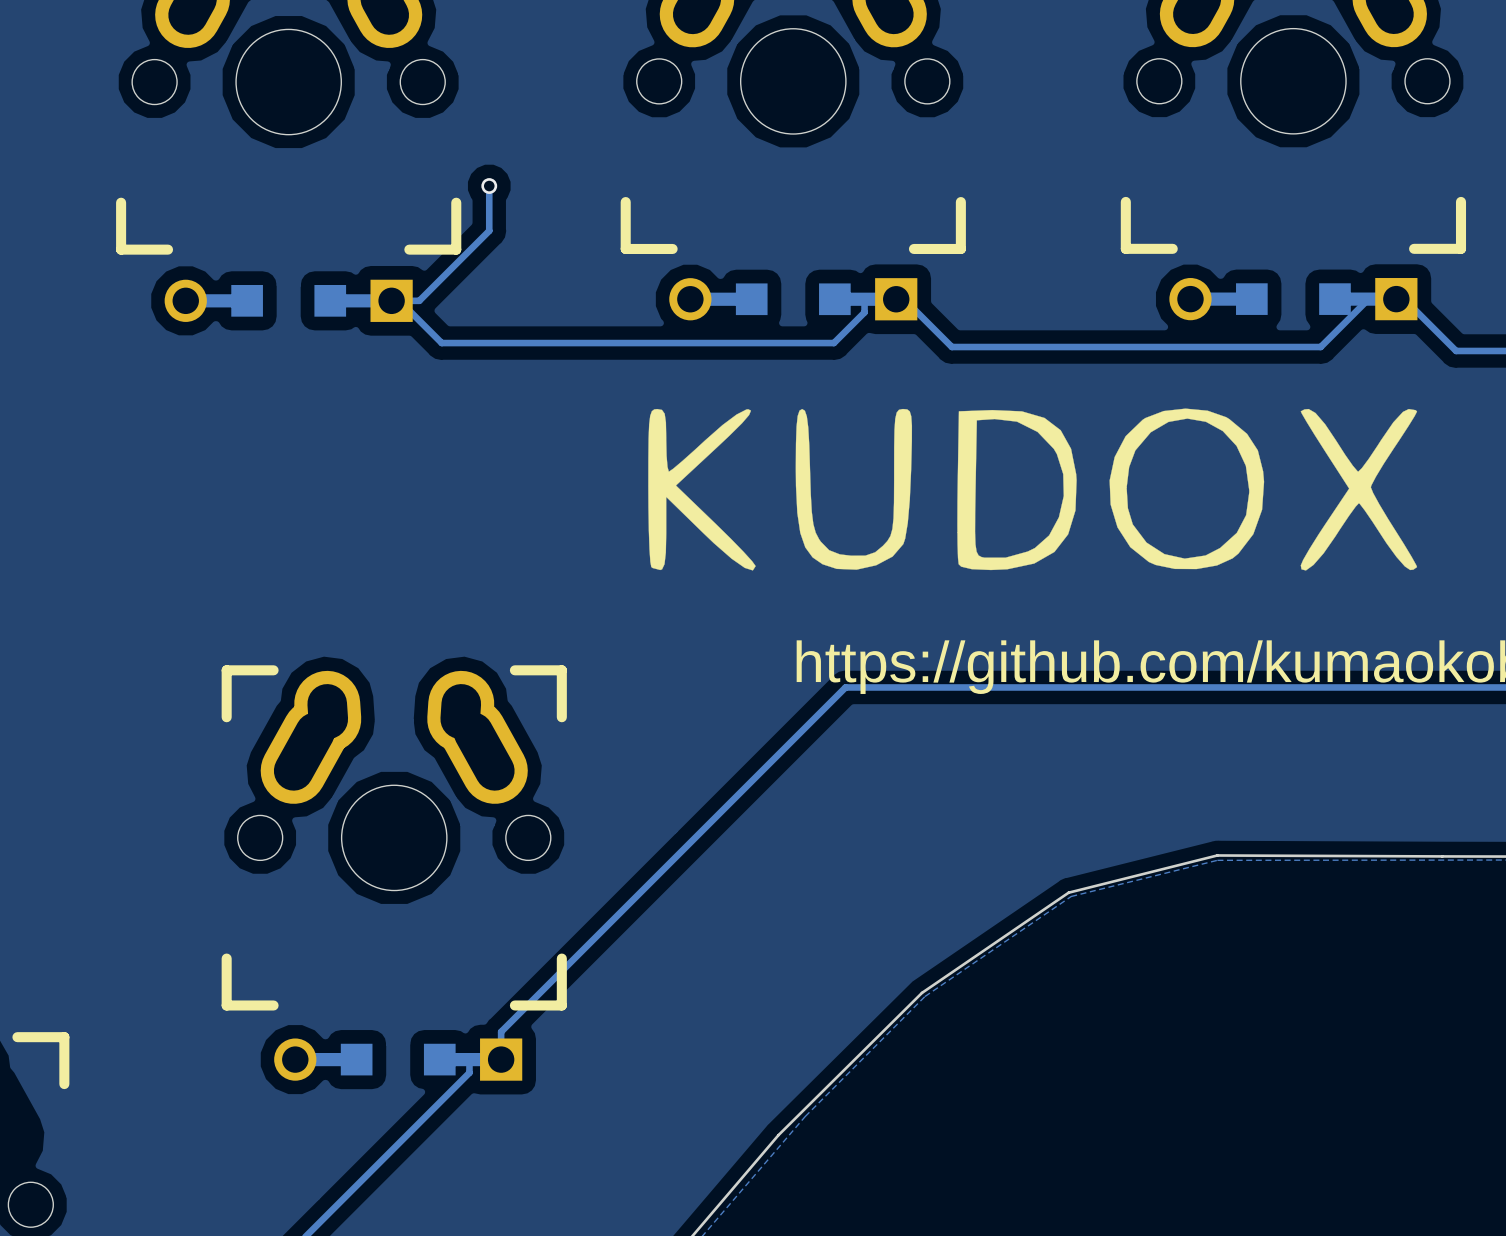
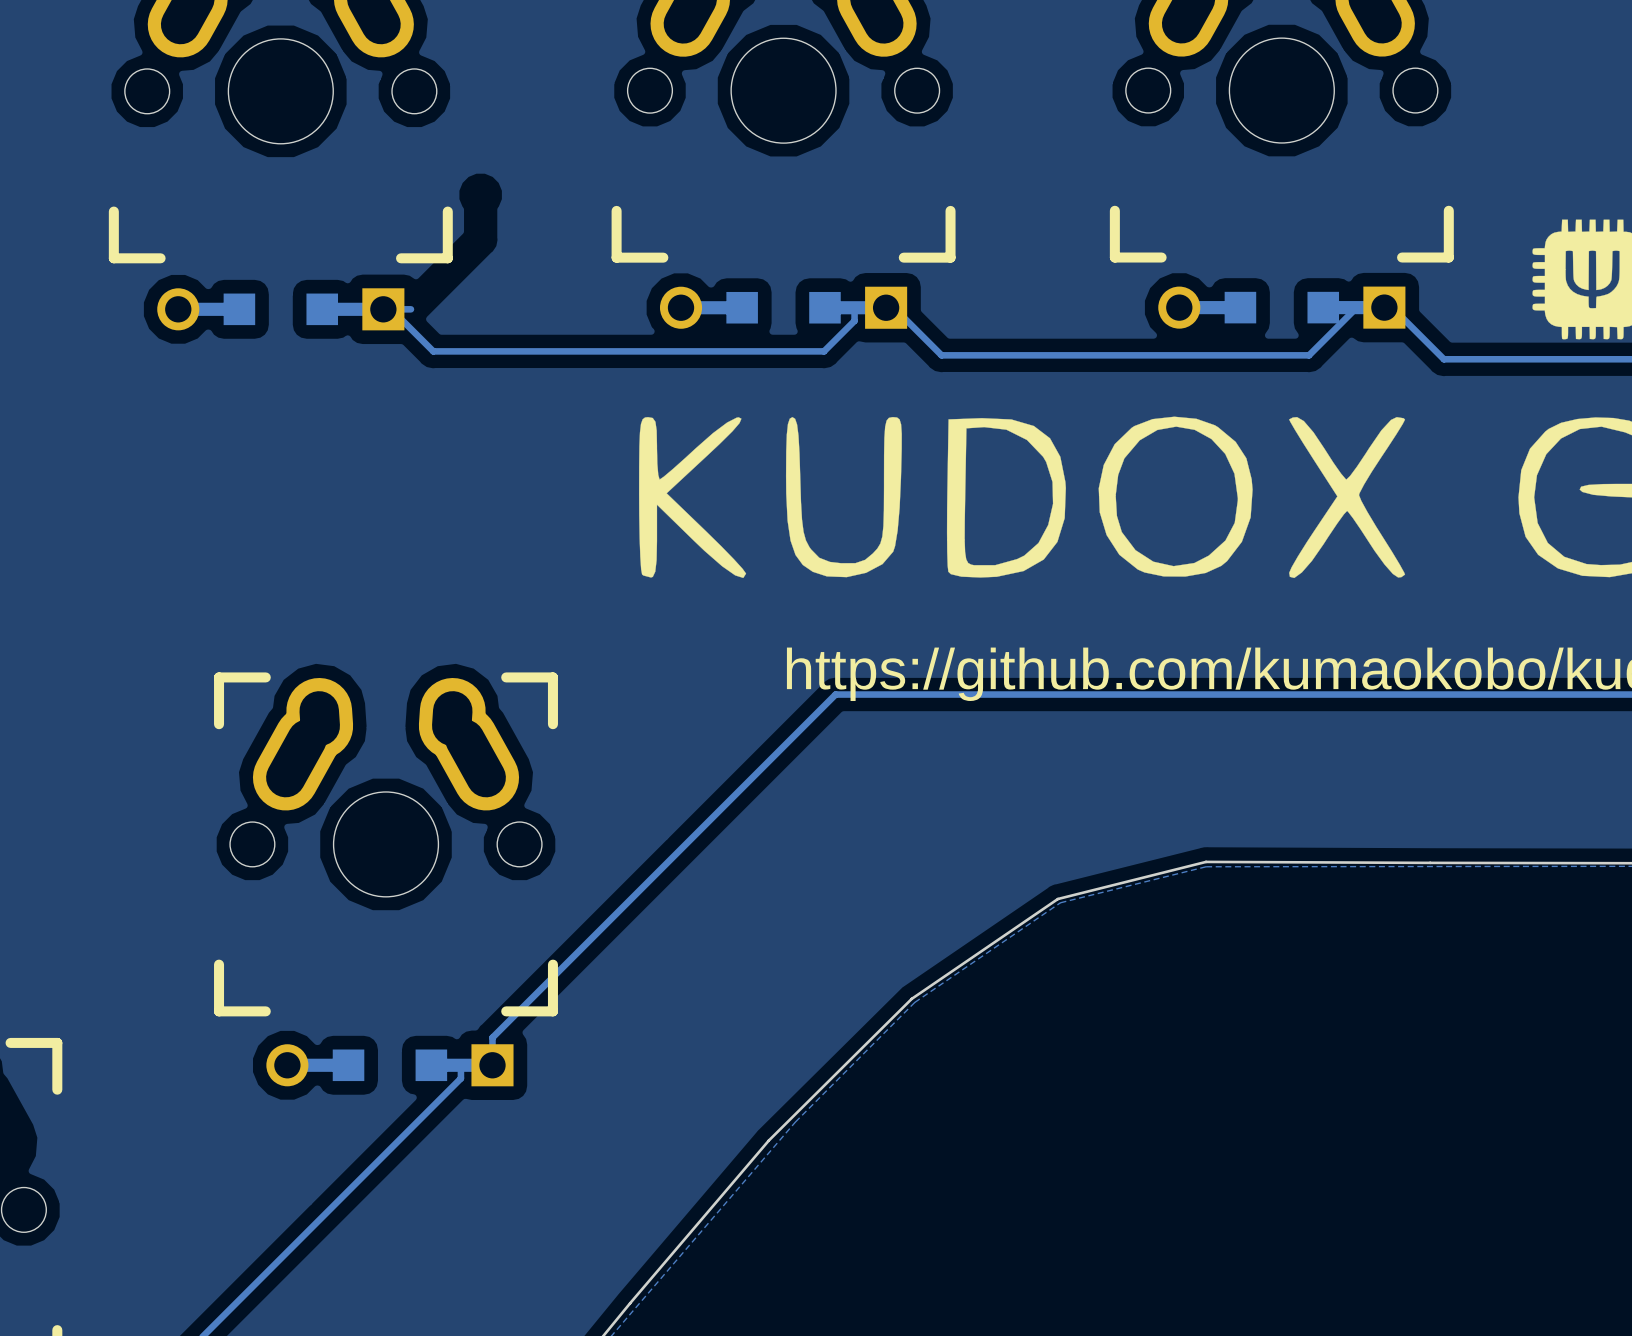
track: (489, 186) (489, 230) (419, 300) -> none
via: (489, 186) -> none

